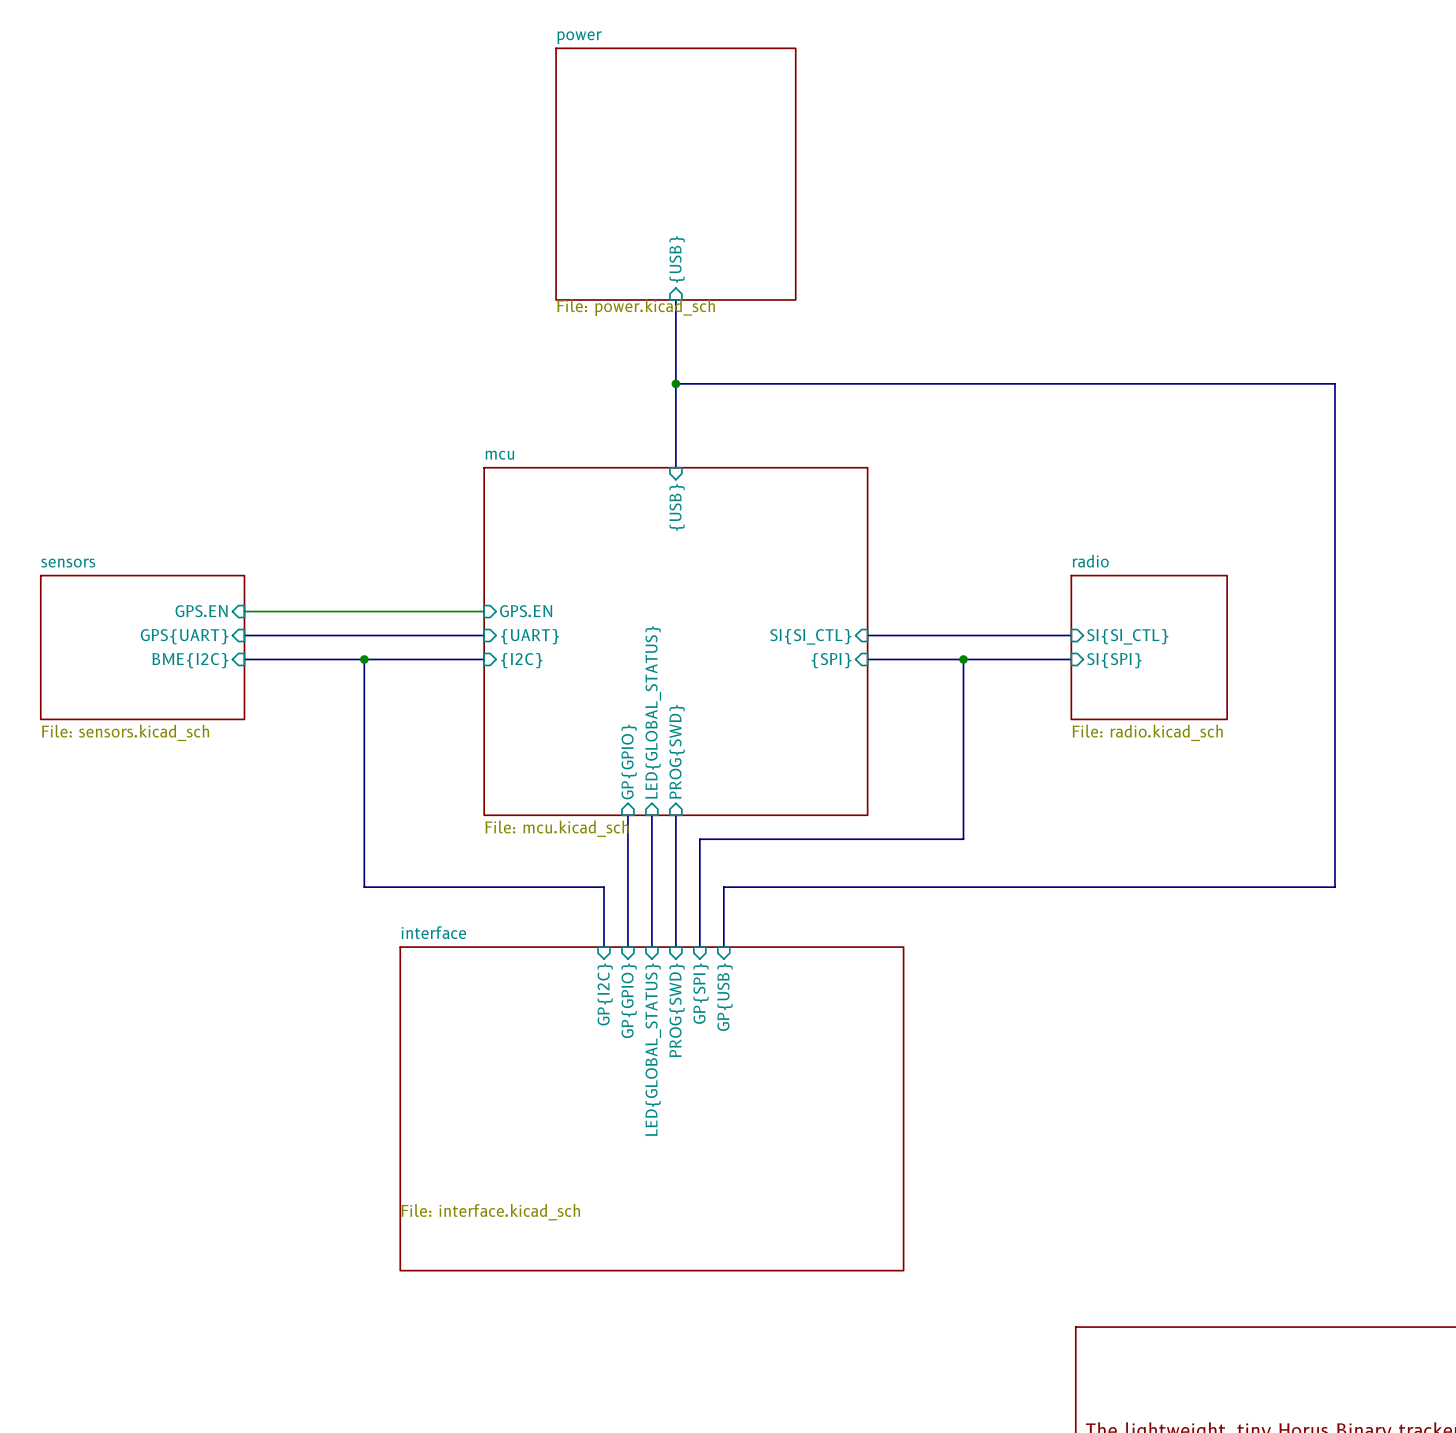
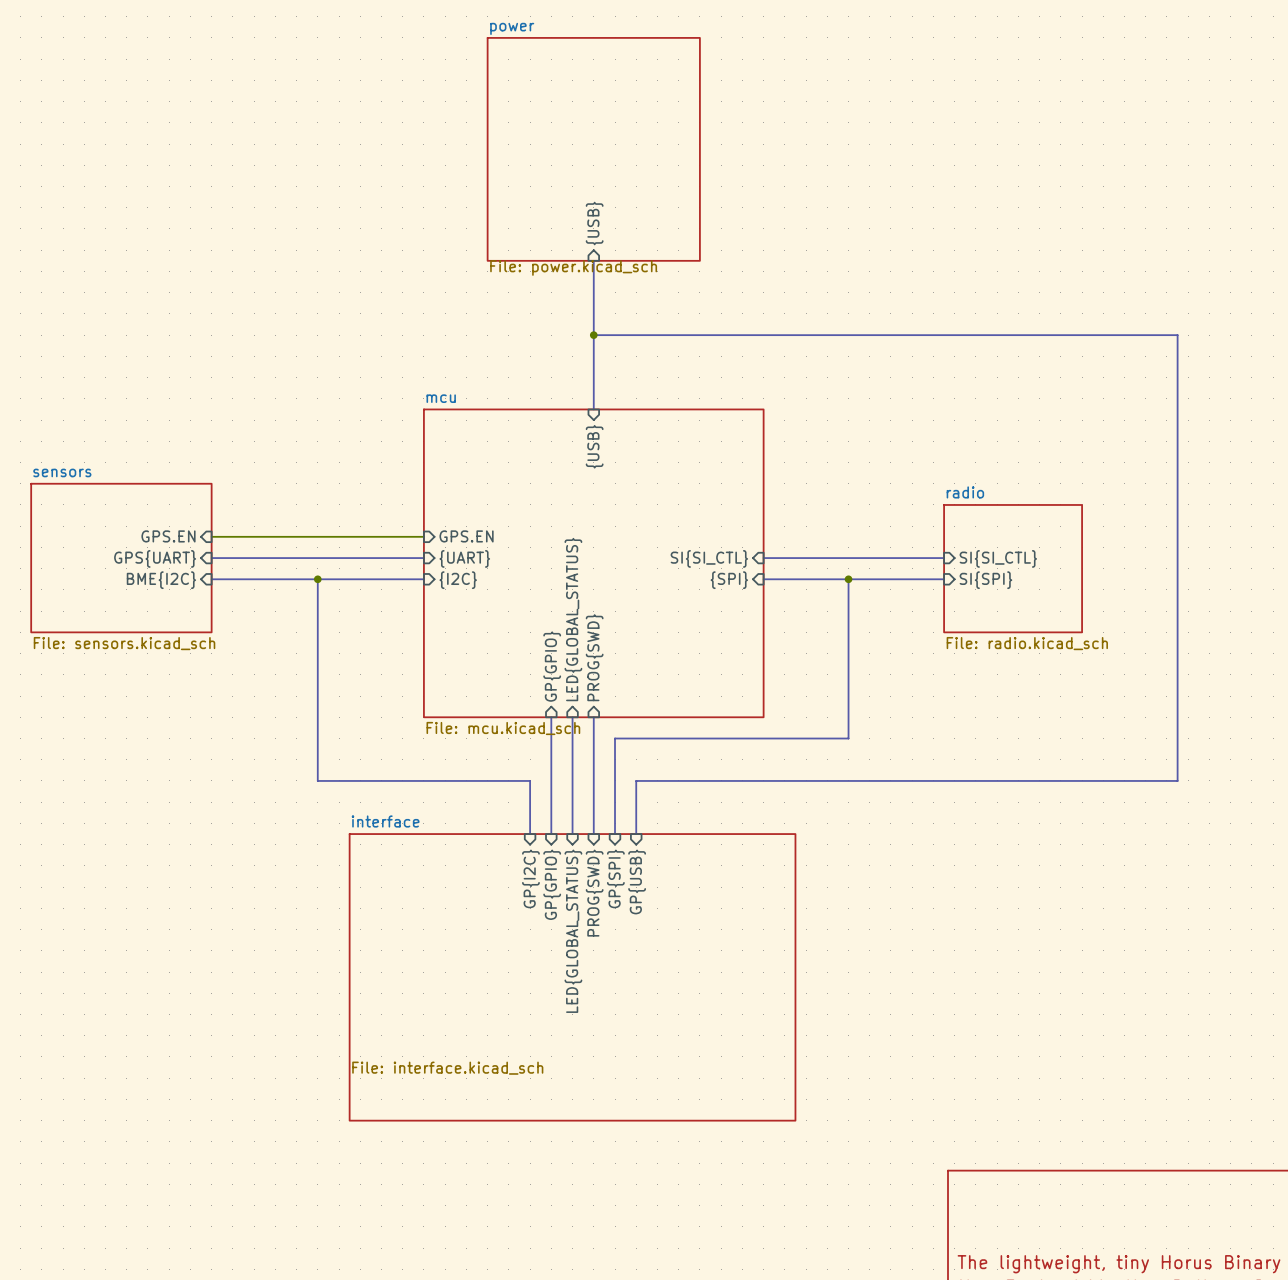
sheet sensors: none -> File: sensors.kicad_sch (121, 558)
sheet sensors: File: sensors.kicad_sch (142, 647) -> none

